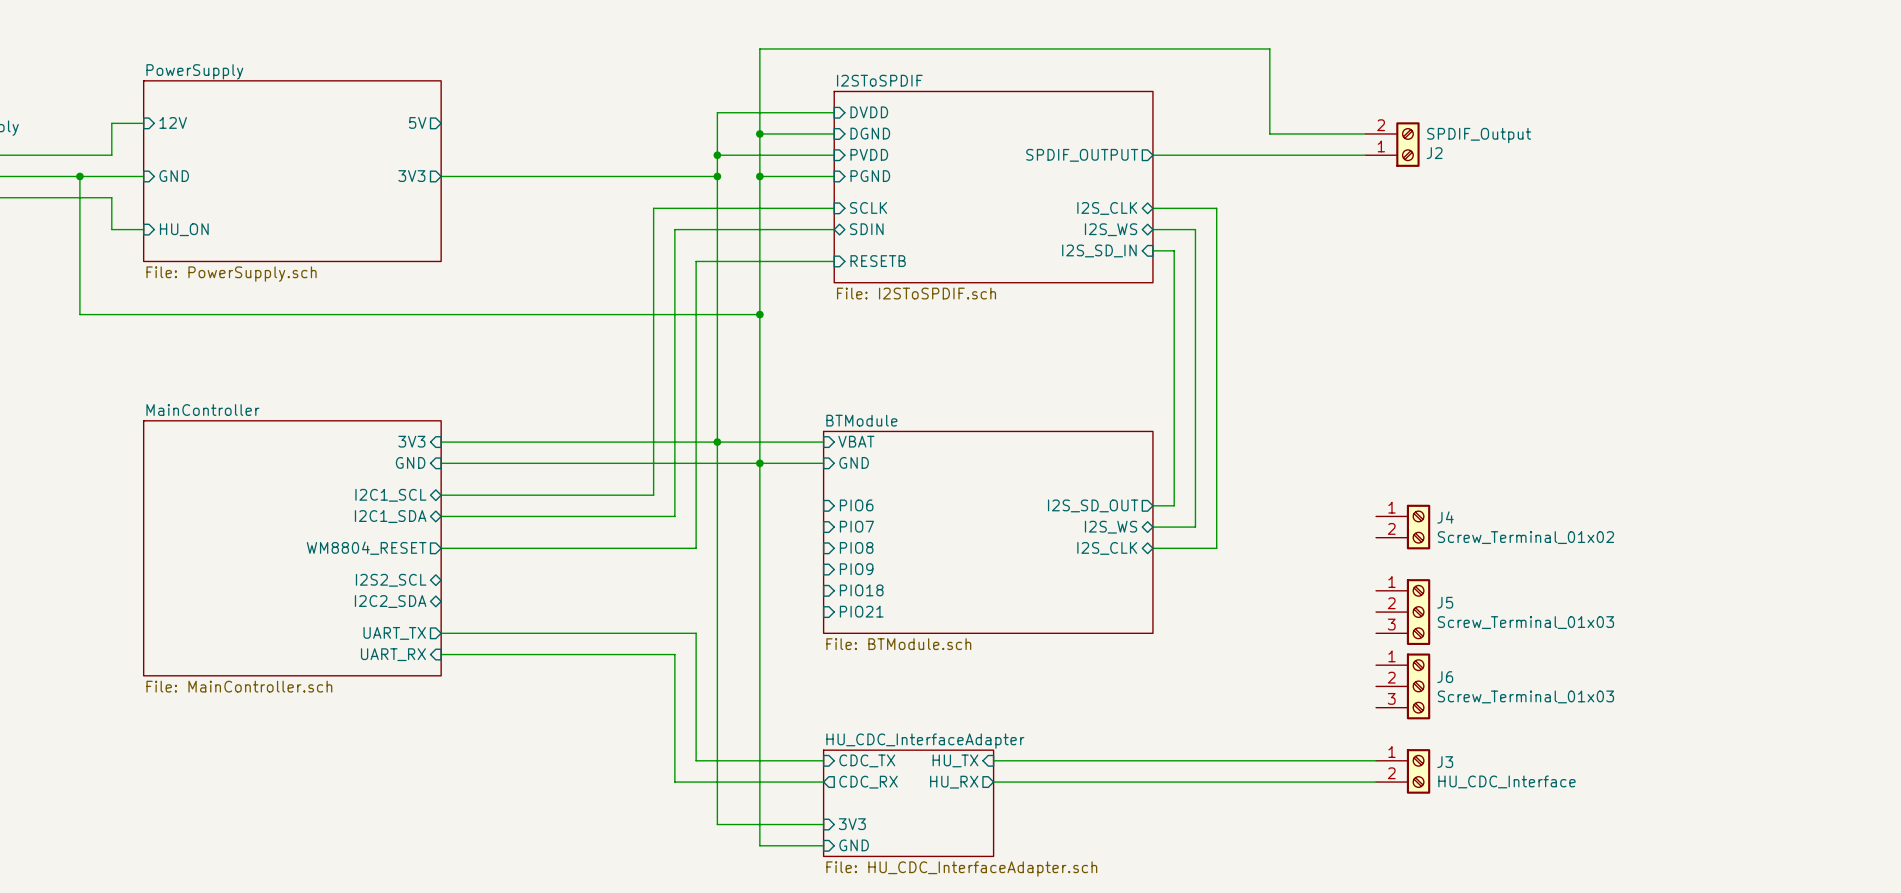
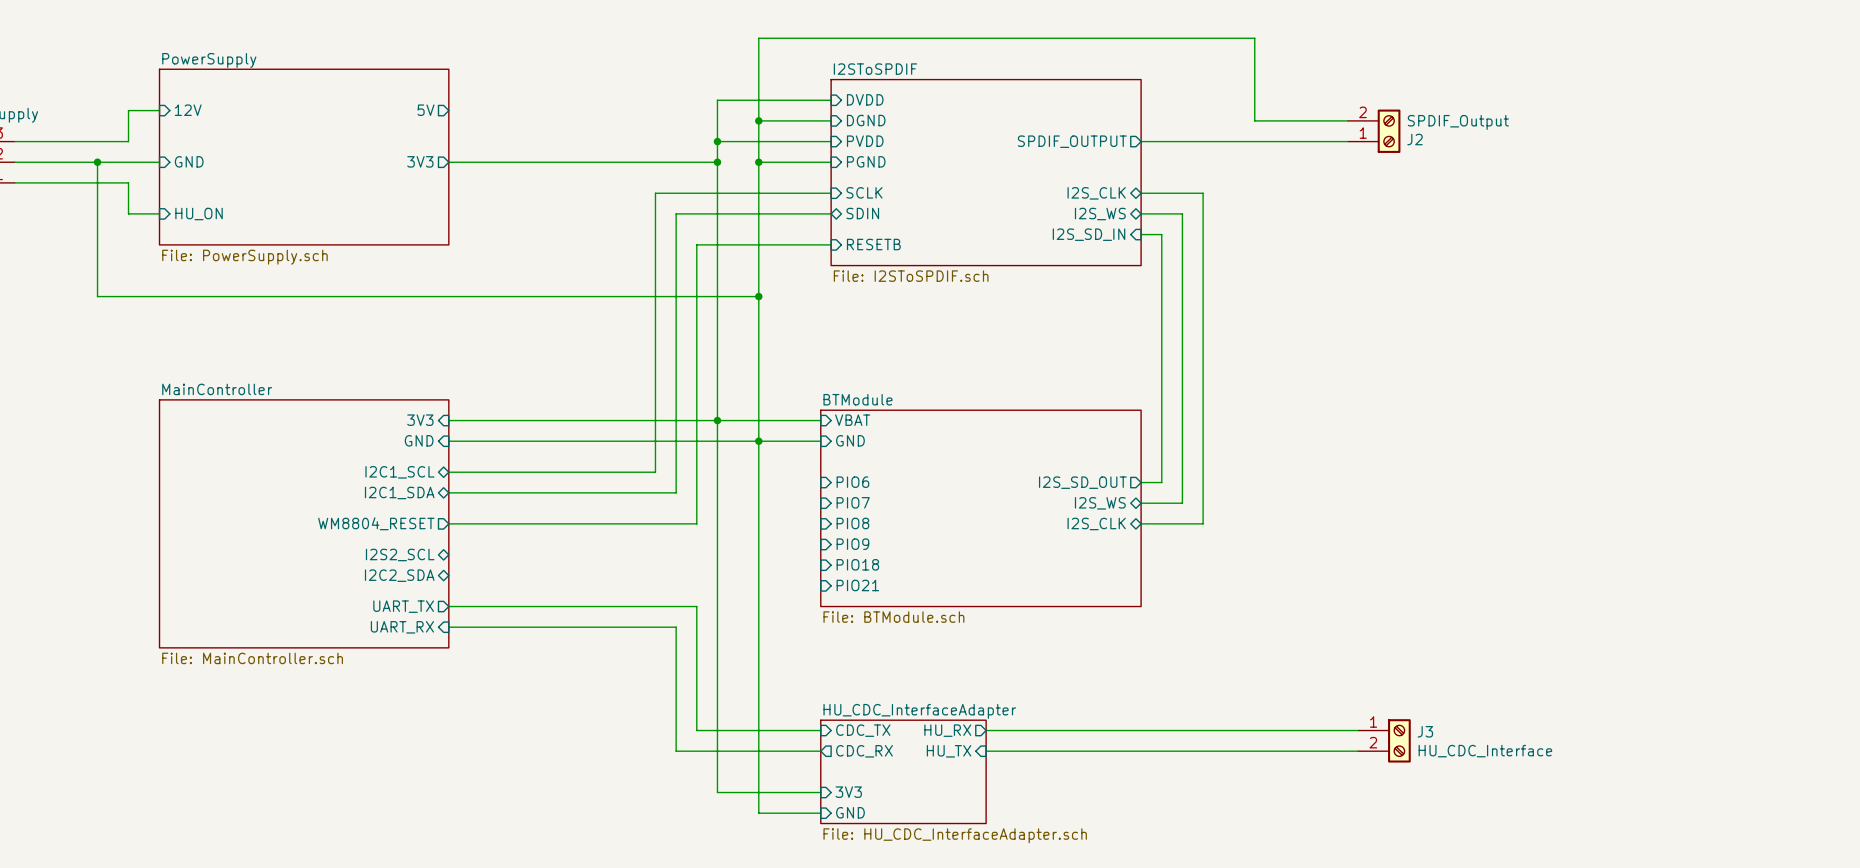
J4: Screw_Terminal_01x02 (1403, 527) -> none
J5: Screw_Terminal_01x03 (1403, 612) -> none
J6: Screw_Terminal_01x03 (1403, 686) -> none
sheet pin shape: input (955, 760) -> output (947, 730)
sheet pin: HU_TX (955, 760) -> HU_RX (947, 730)
sheet pin shape: output (954, 782) -> input (949, 751)
sheet pin: HU_RX (954, 782) -> HU_TX (949, 751)

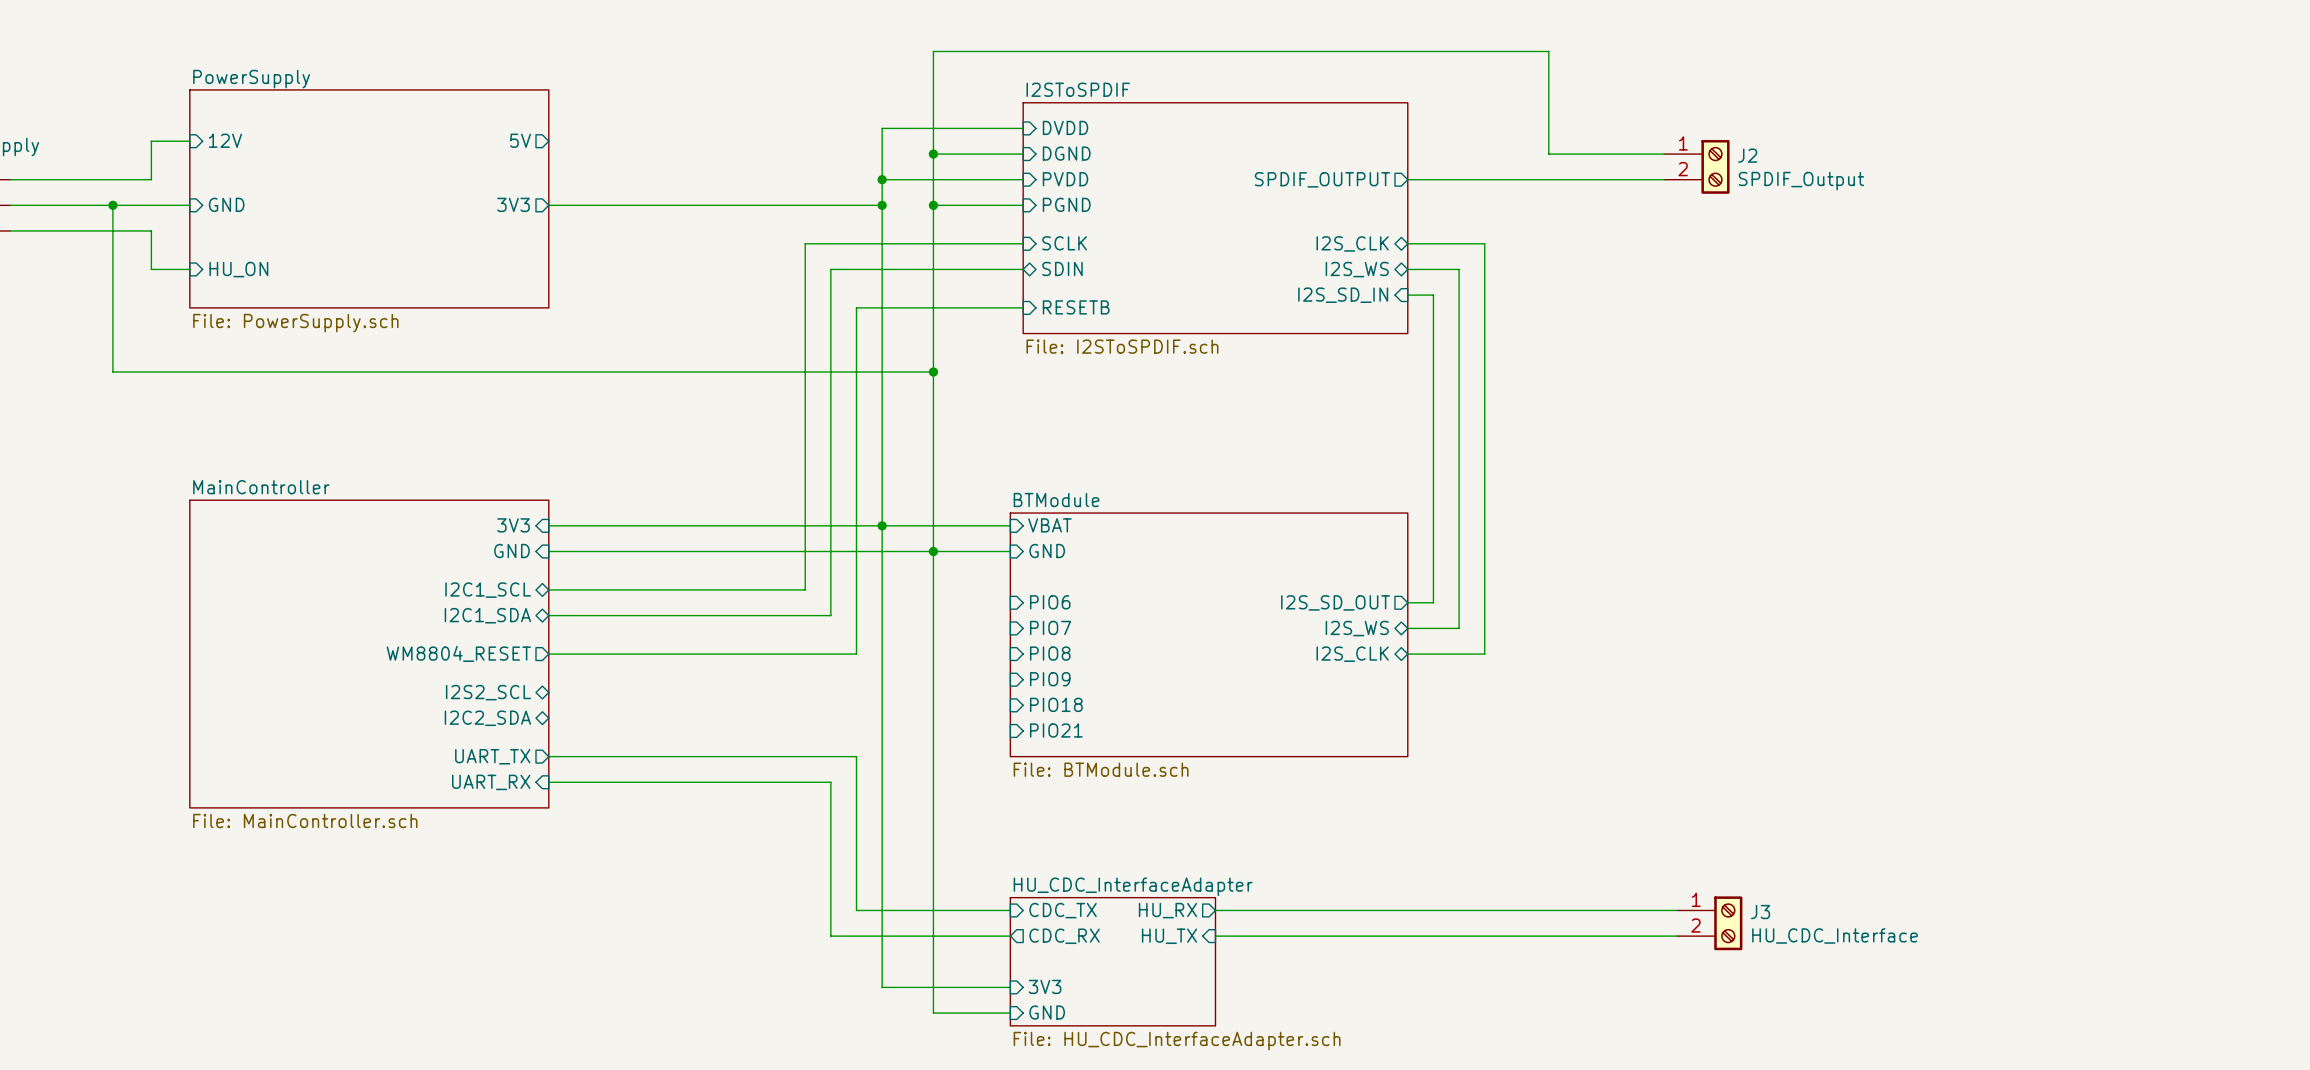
J2 flip: as is (1389, 131) -> up-down (1715, 166)

